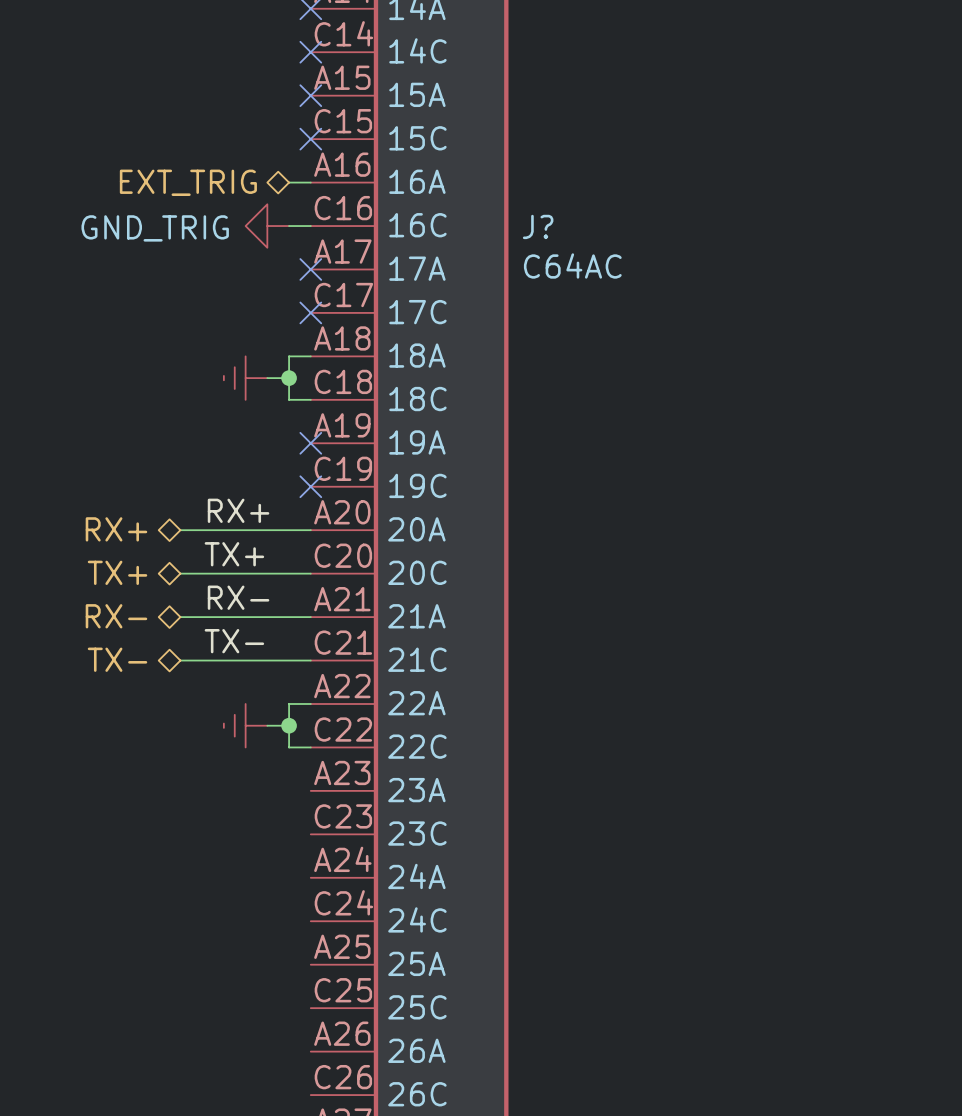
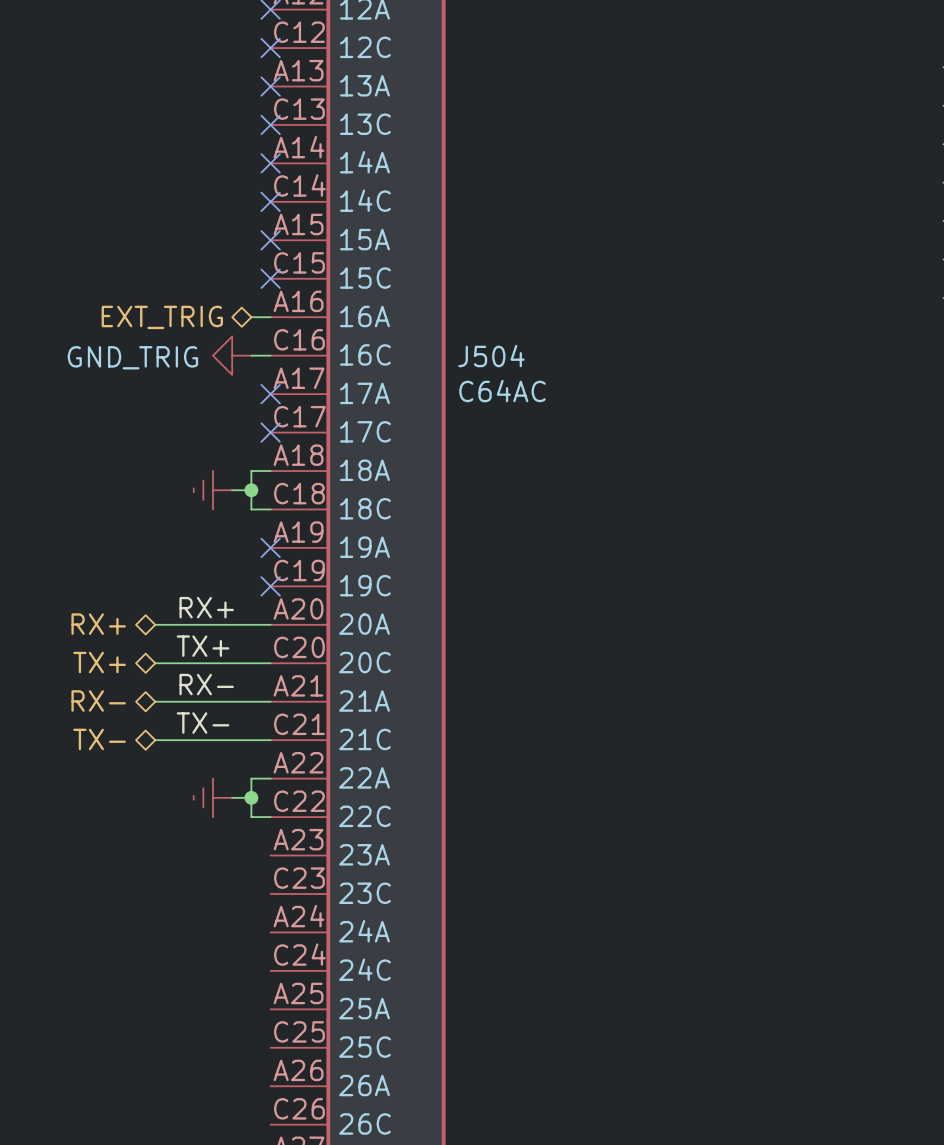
J? name: J? (538, 226) -> J504 (491, 356)

